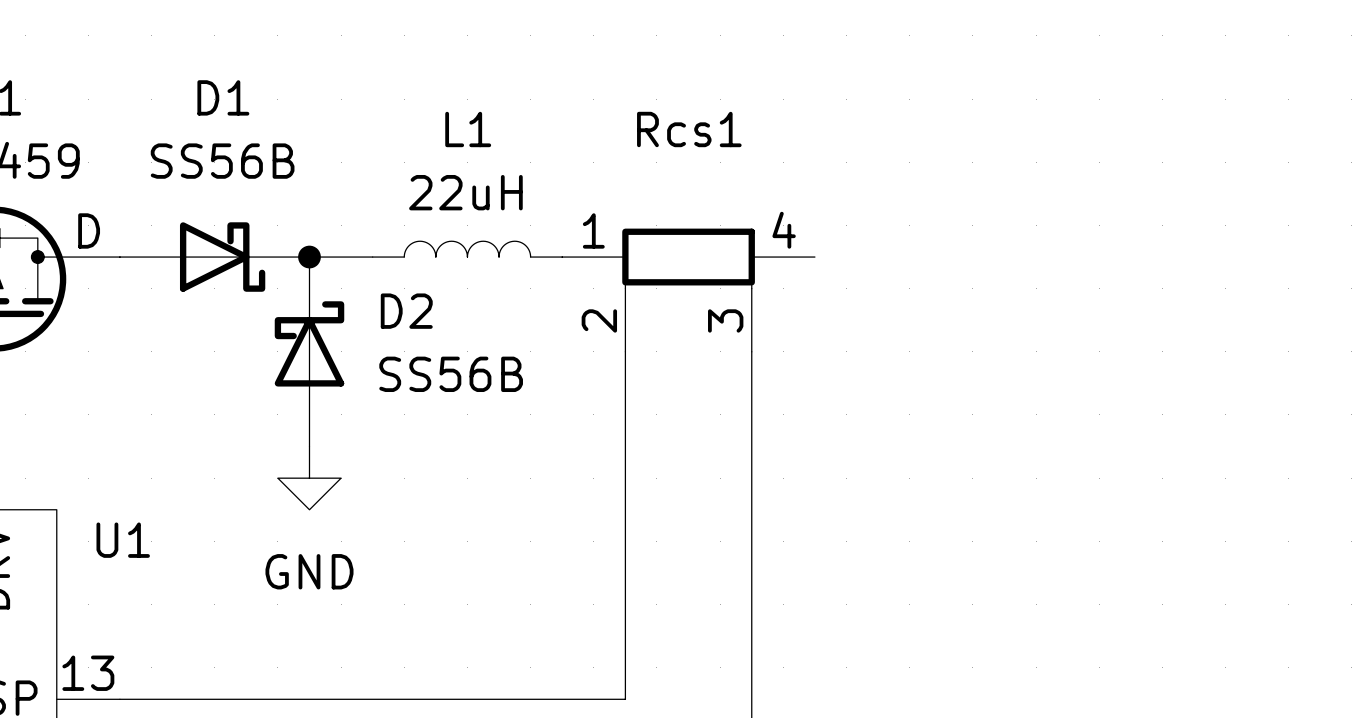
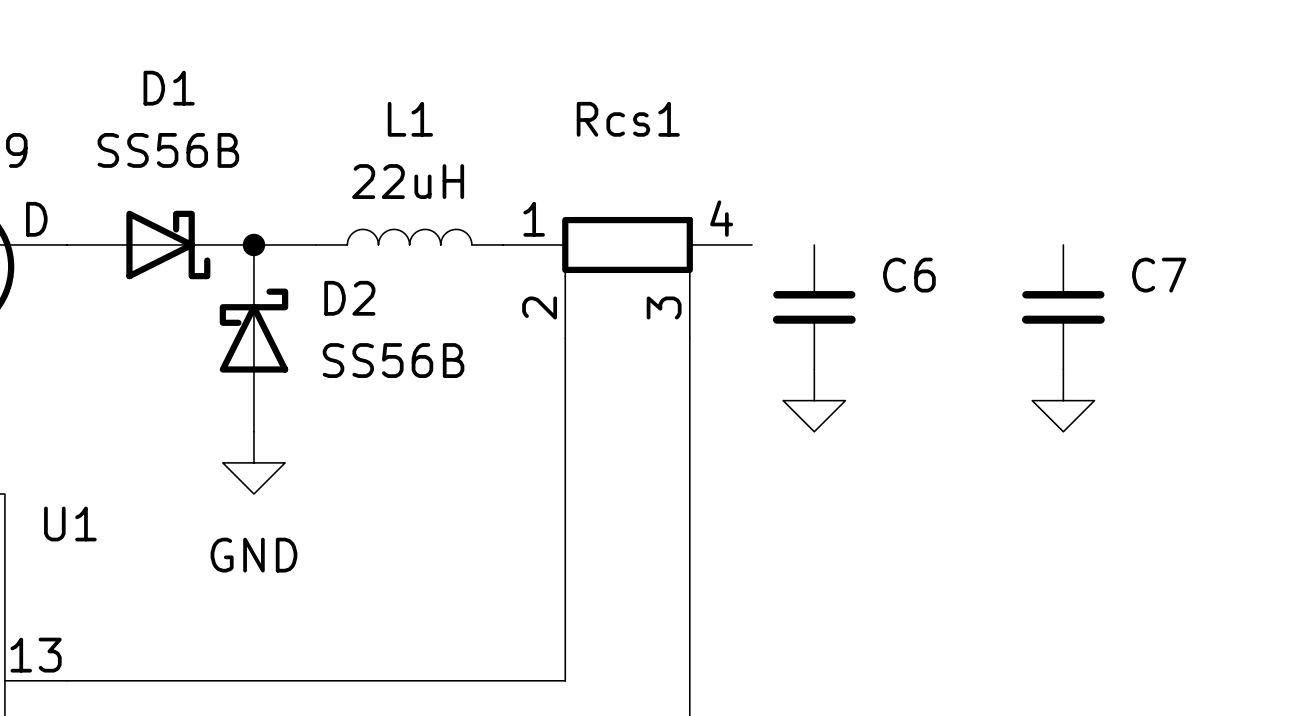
C6: none -> (814, 307)
C7: none -> (1063, 307)
power symbol: none -> (814, 400)
power symbol: none -> (1063, 400)

